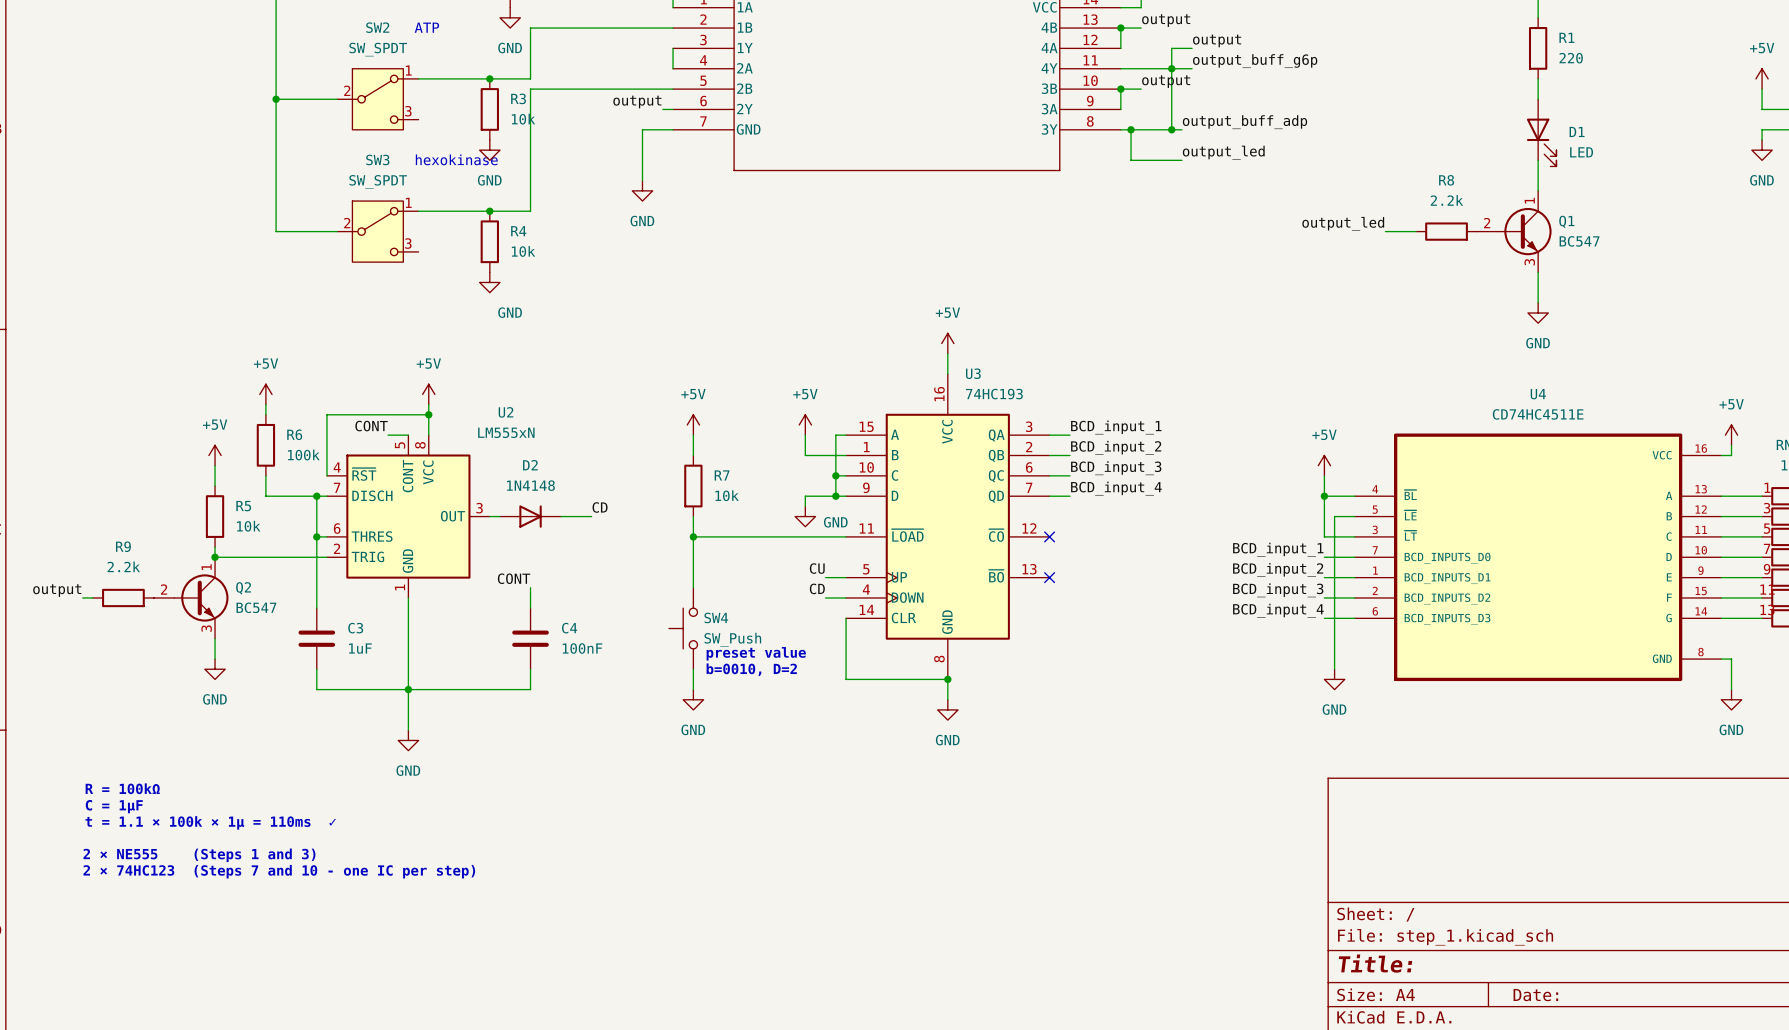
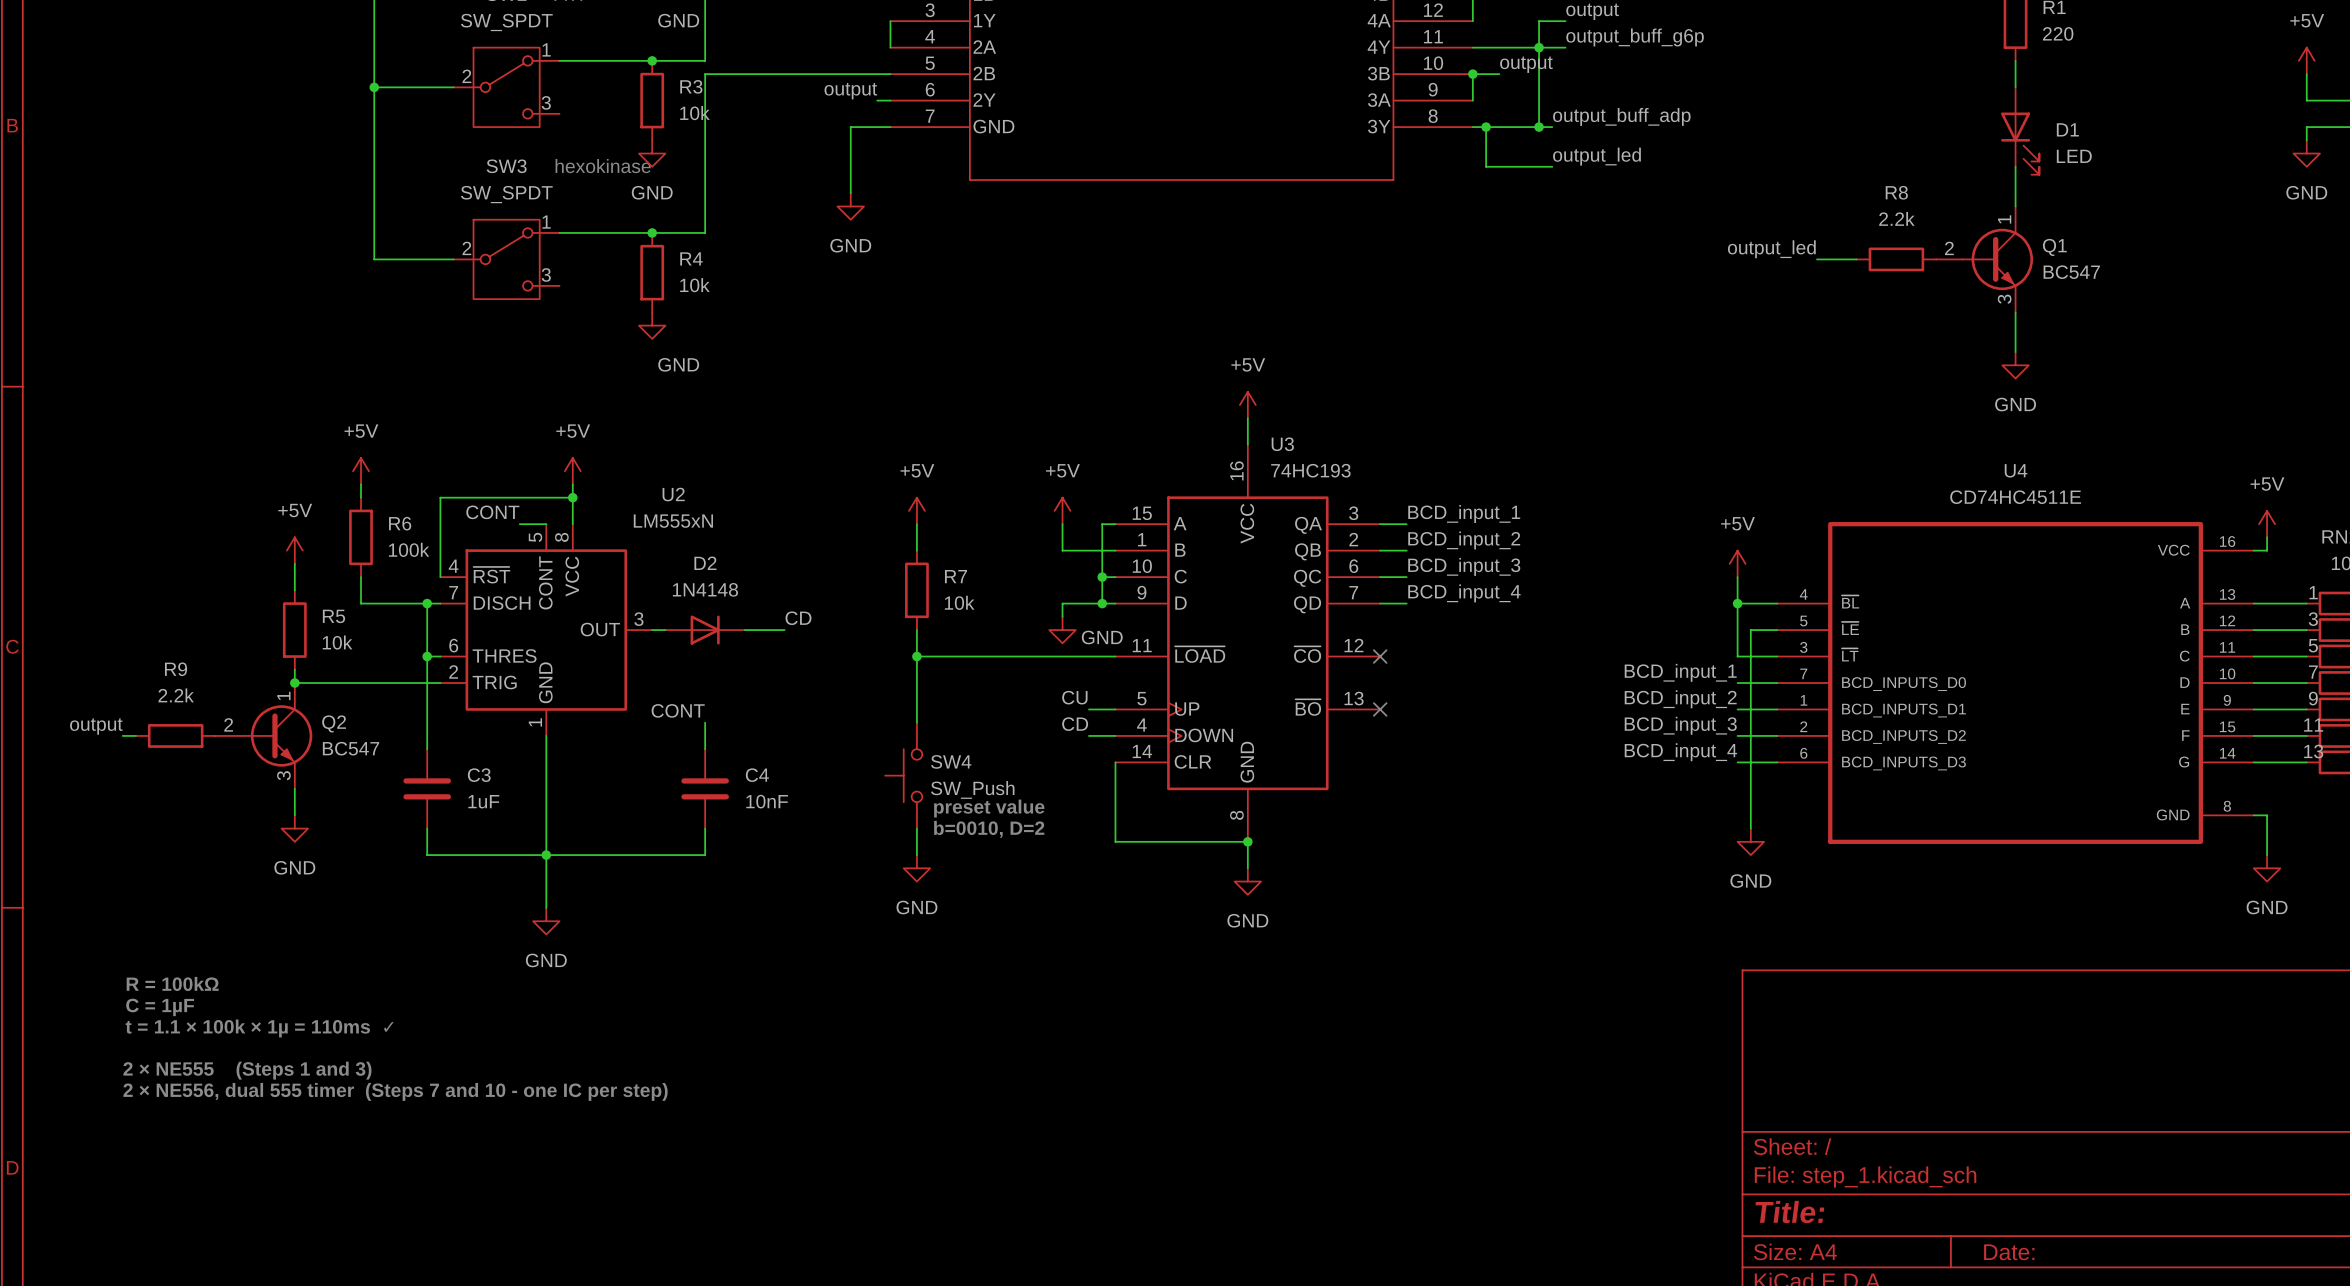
C4 value: 100nF (582, 648) -> 10nF (767, 801)
text: 2 × 74HC123 (Steps 7 and 10 - one IC per step) (279, 871) -> 2 × NE556, dual 555 timer (Steps 7 and 10 - one IC per step) (395, 1091)

